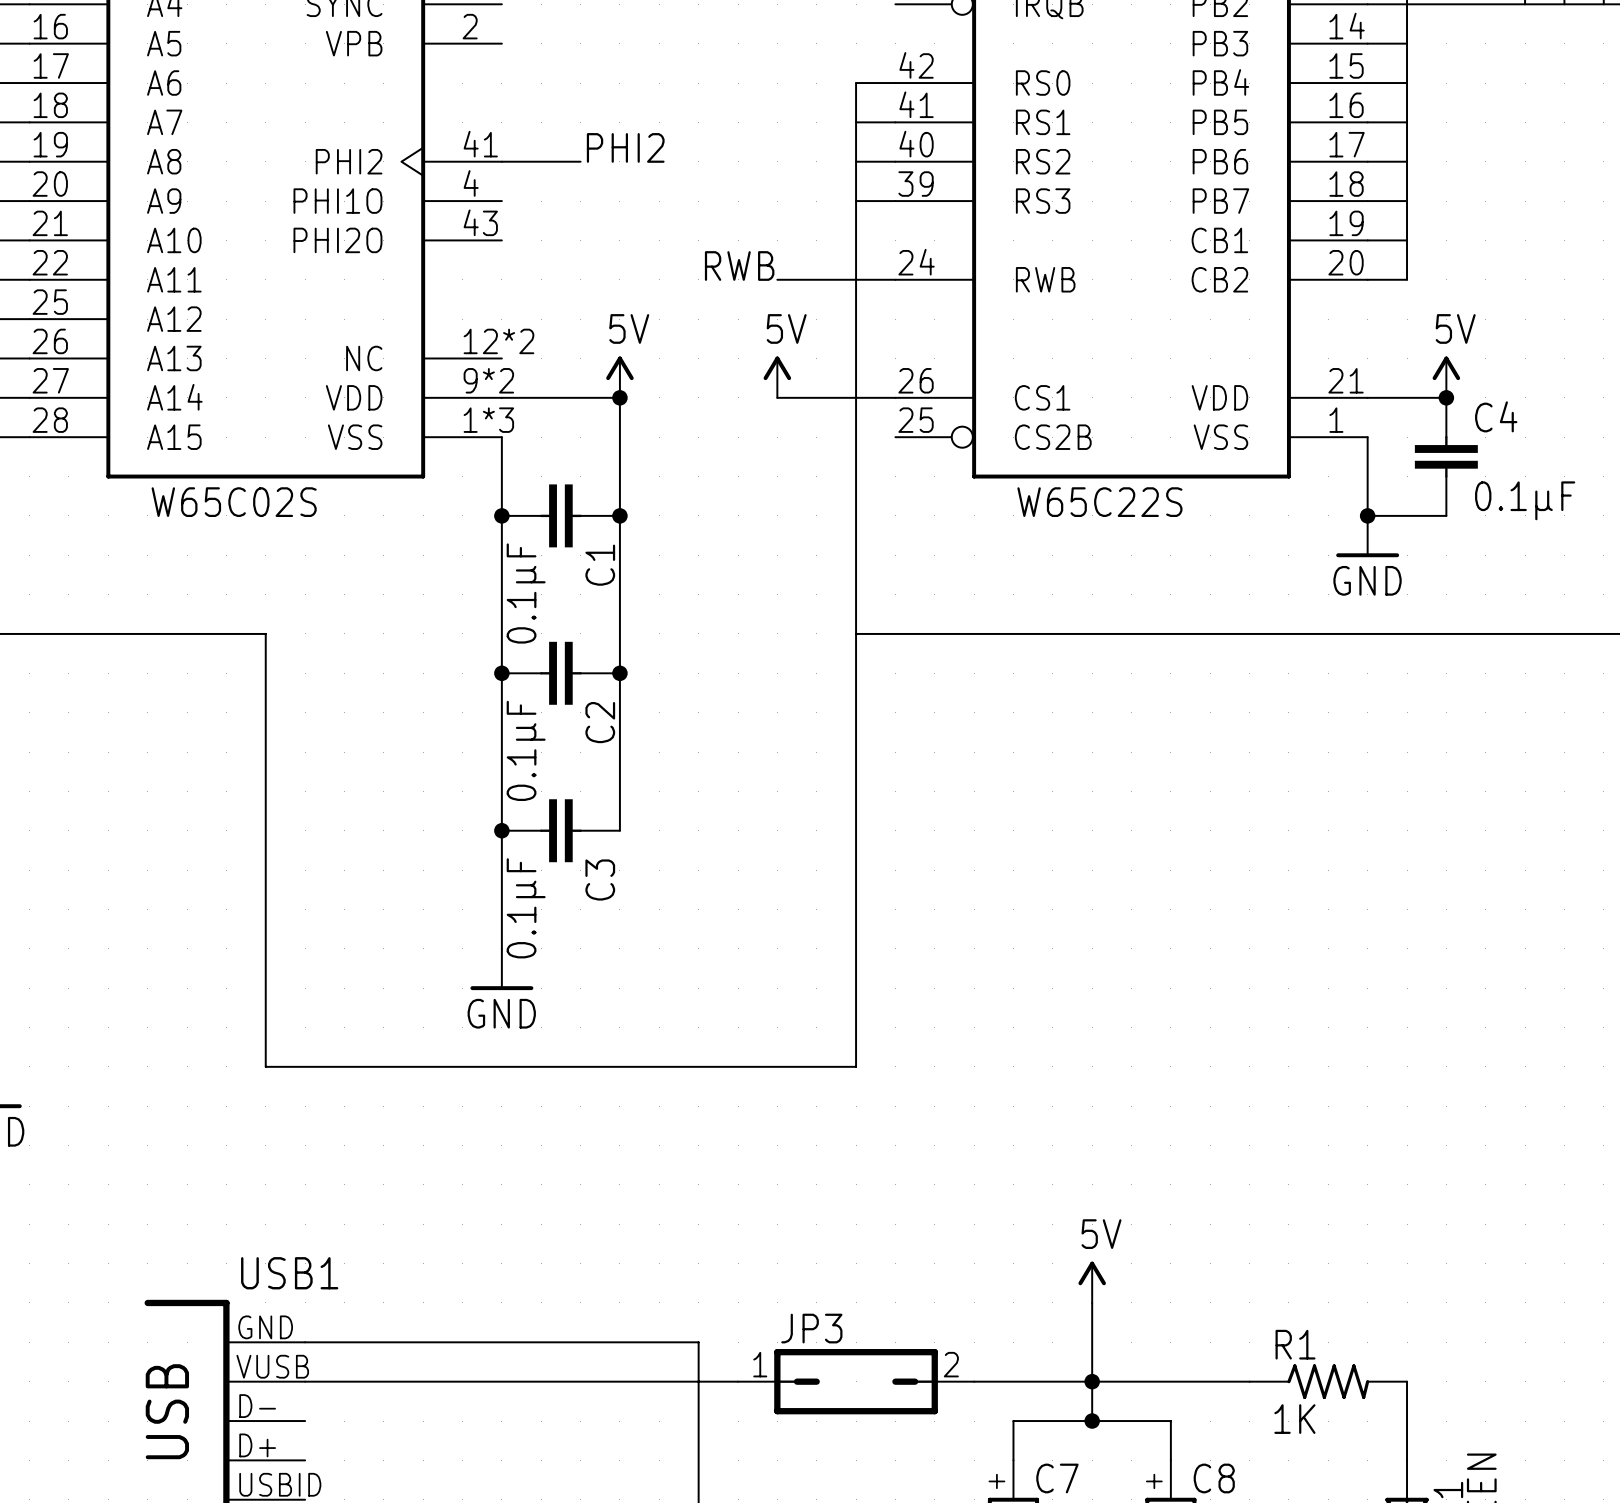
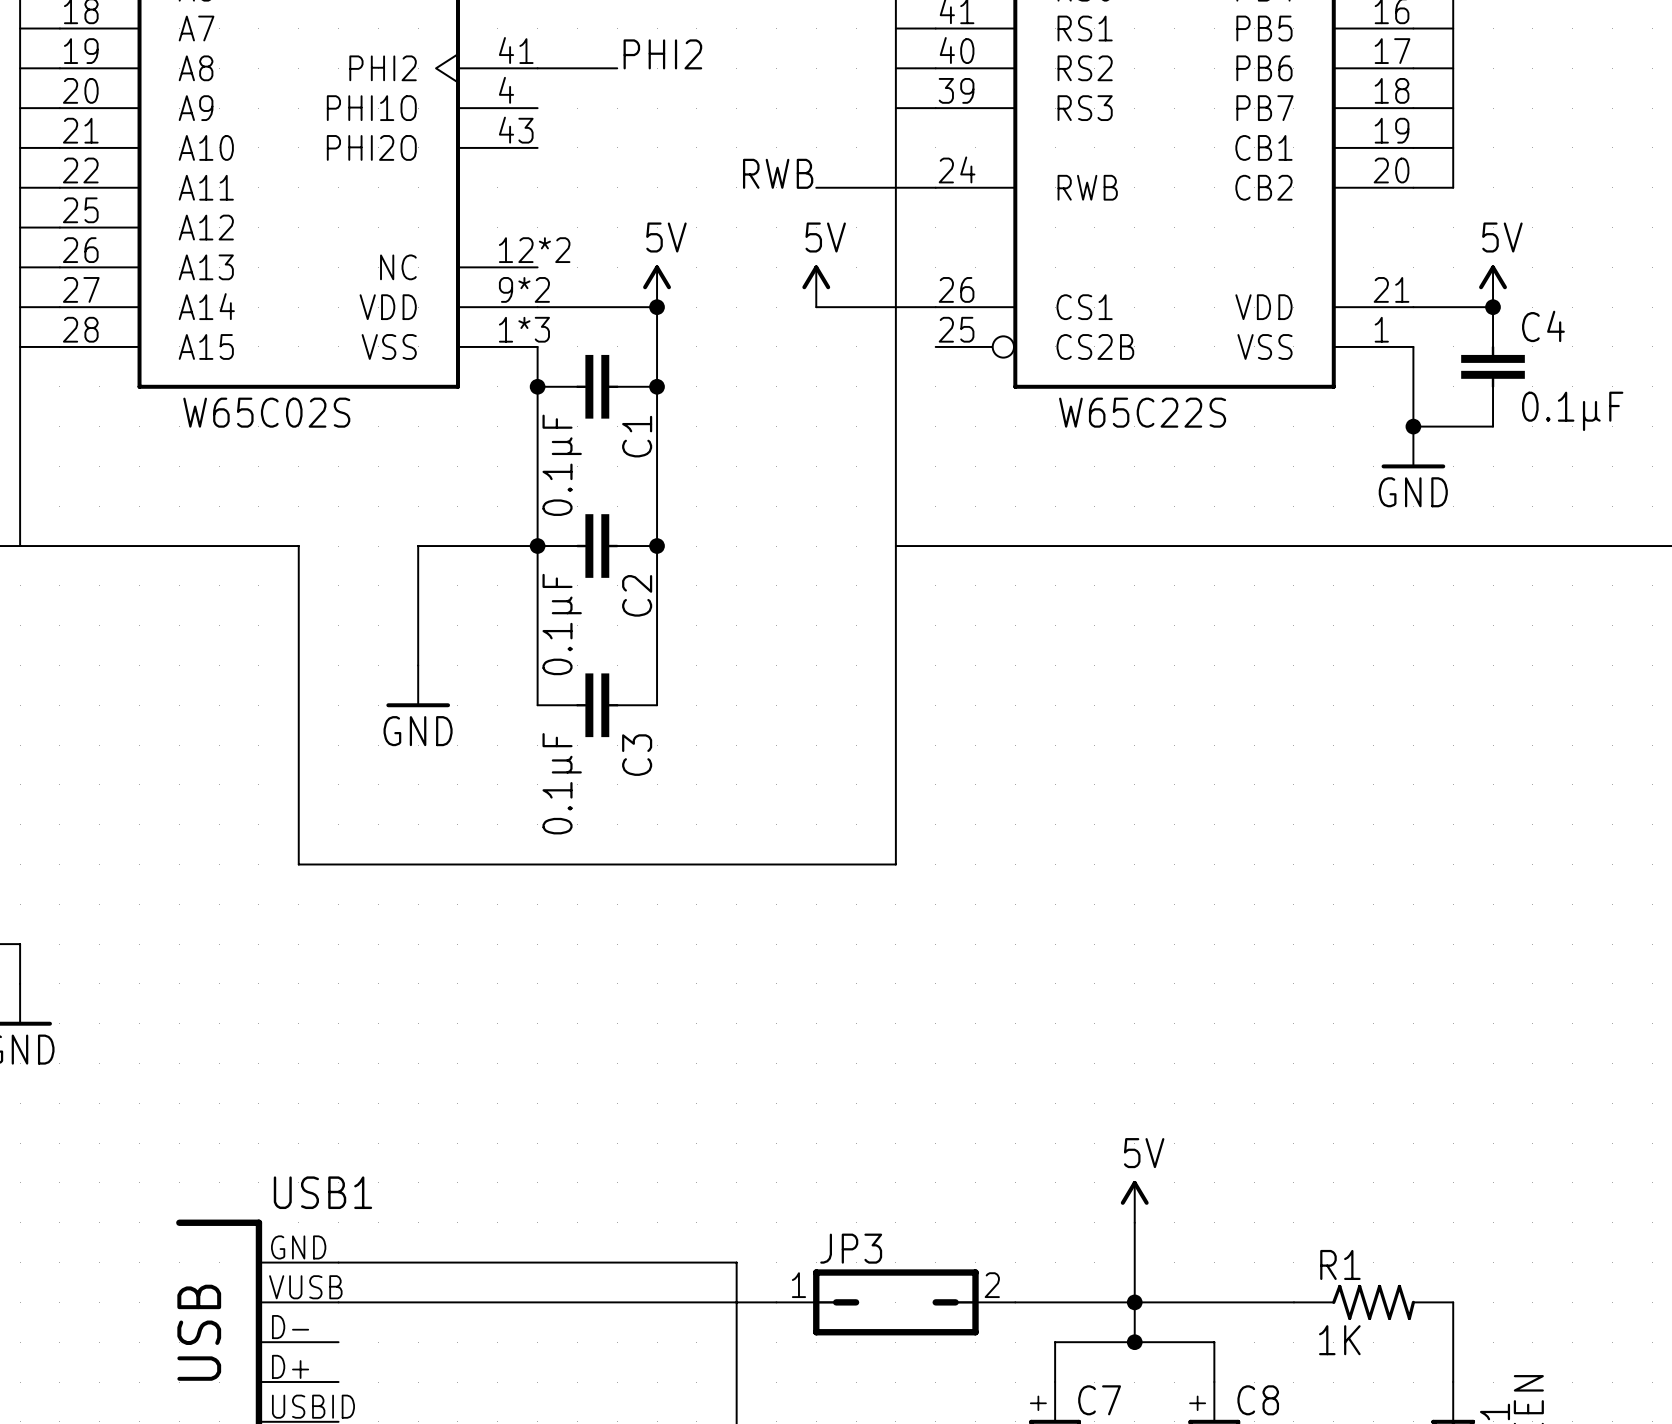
junction position: (501, 515) -> (537, 386)
C1 position: (560, 515) -> (597, 386)
junction position: (619, 515) -> (657, 386)
wire: none -> (537, 546) (418, 546) (418, 665)
junction position: (501, 673) -> (537, 546)
C2 position: (560, 673) -> (597, 546)
junction position: (619, 673) -> (657, 546)
wire: (501, 791) (501, 948) -> none
wire: (619, 791) (619, 830) -> none
junction: (501, 830) -> none
C3 position: (560, 830) -> (597, 705)
bus: (265, 948) (265, 1066) (856, 1066) (856, 948) -> (298, 864) (895, 864)
power symbol position: GND (501, 969) -> GND (418, 686)

